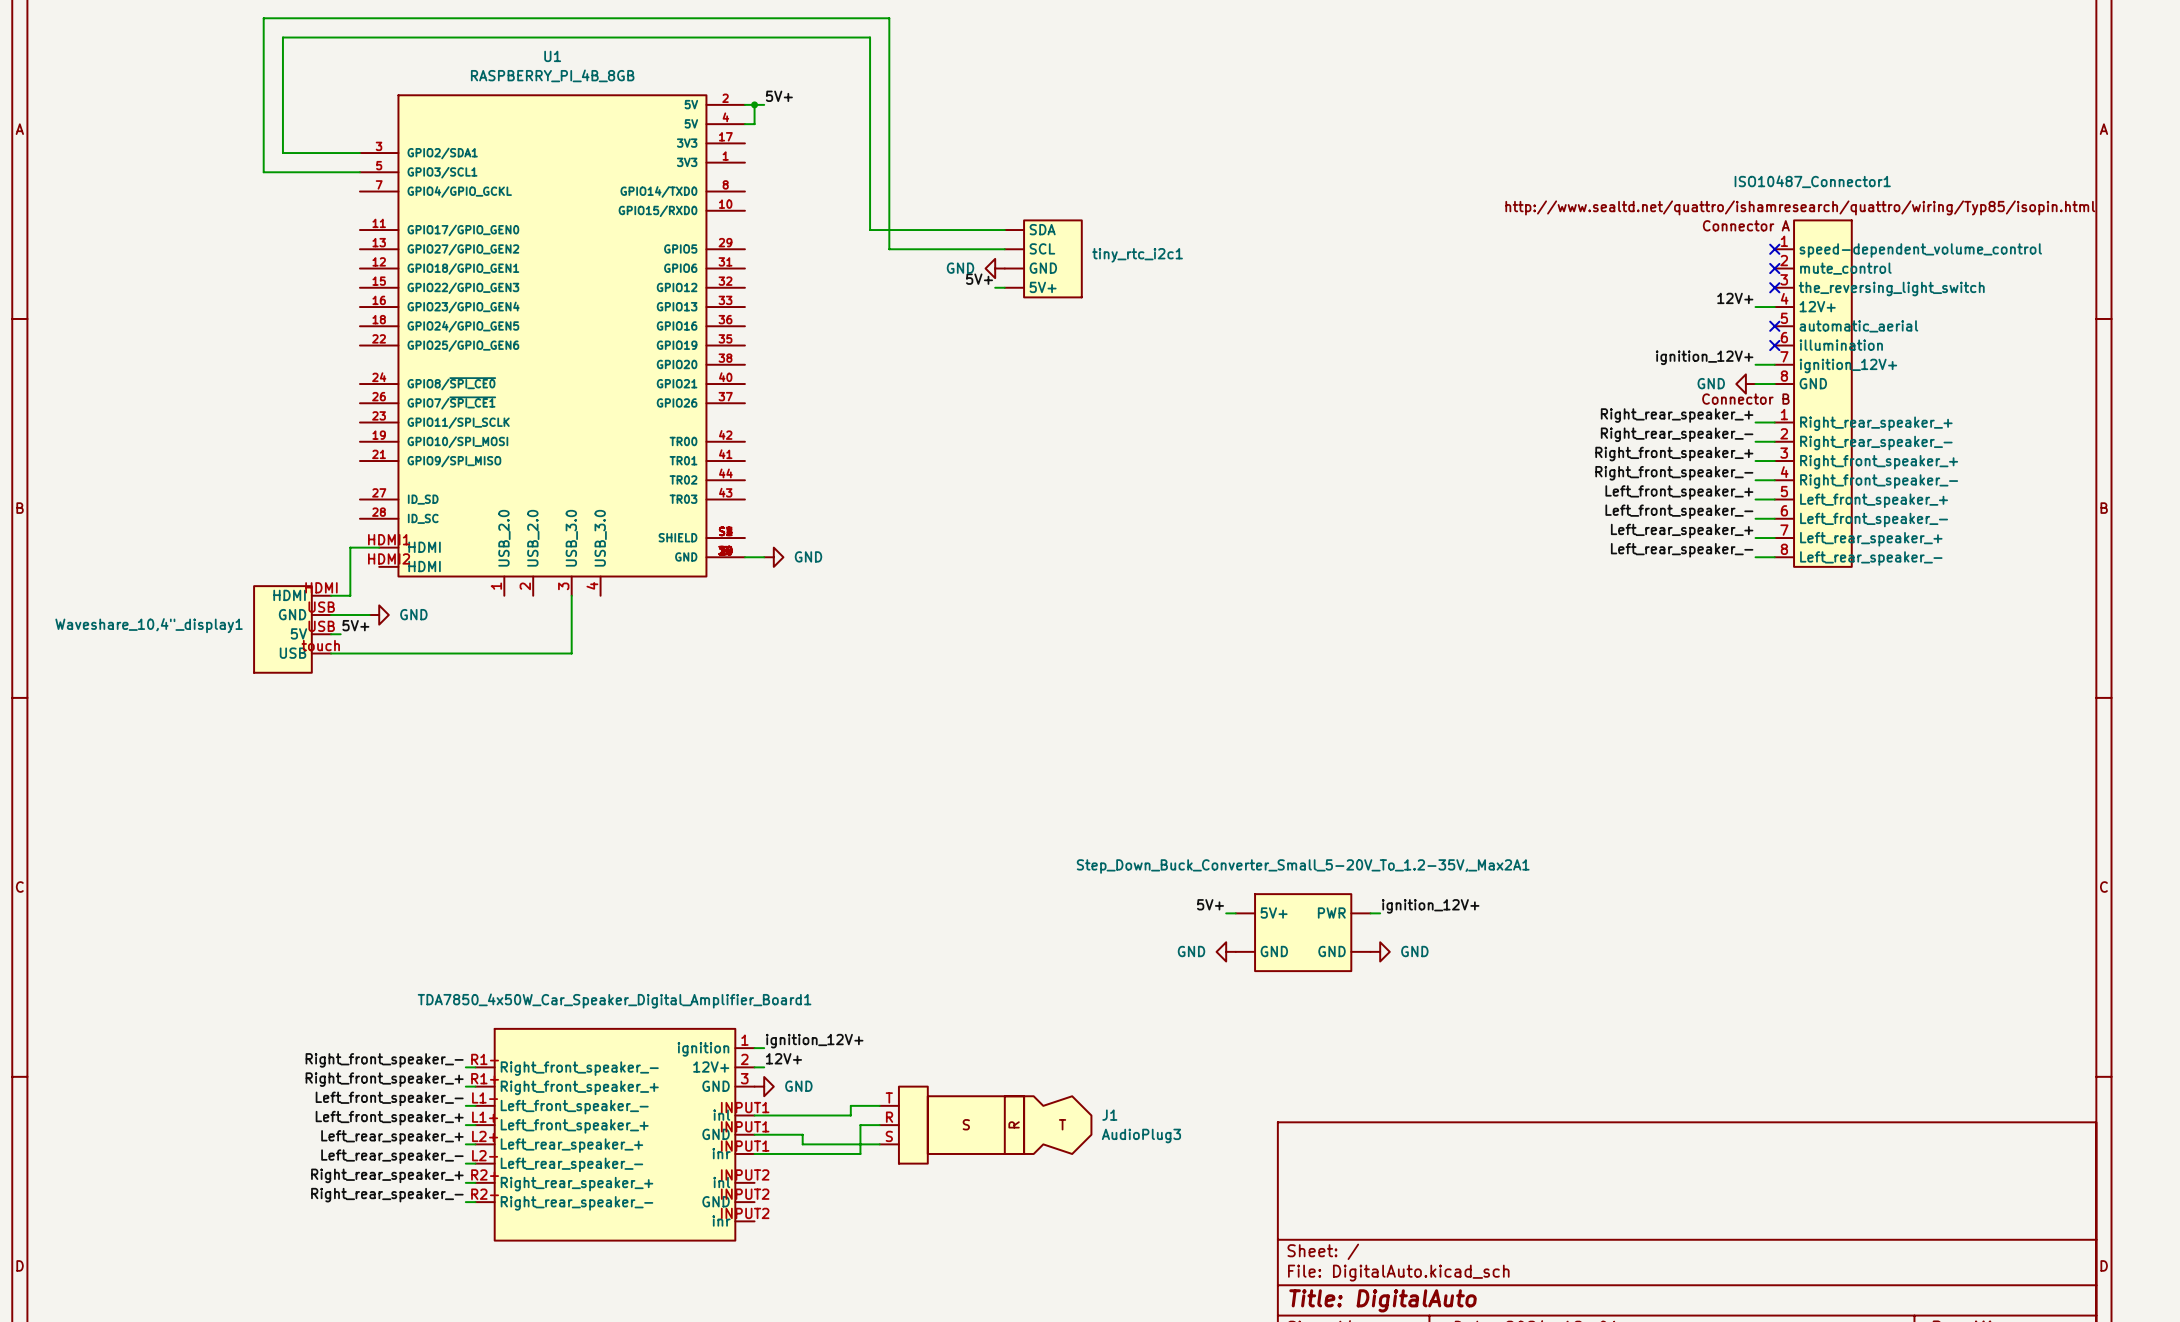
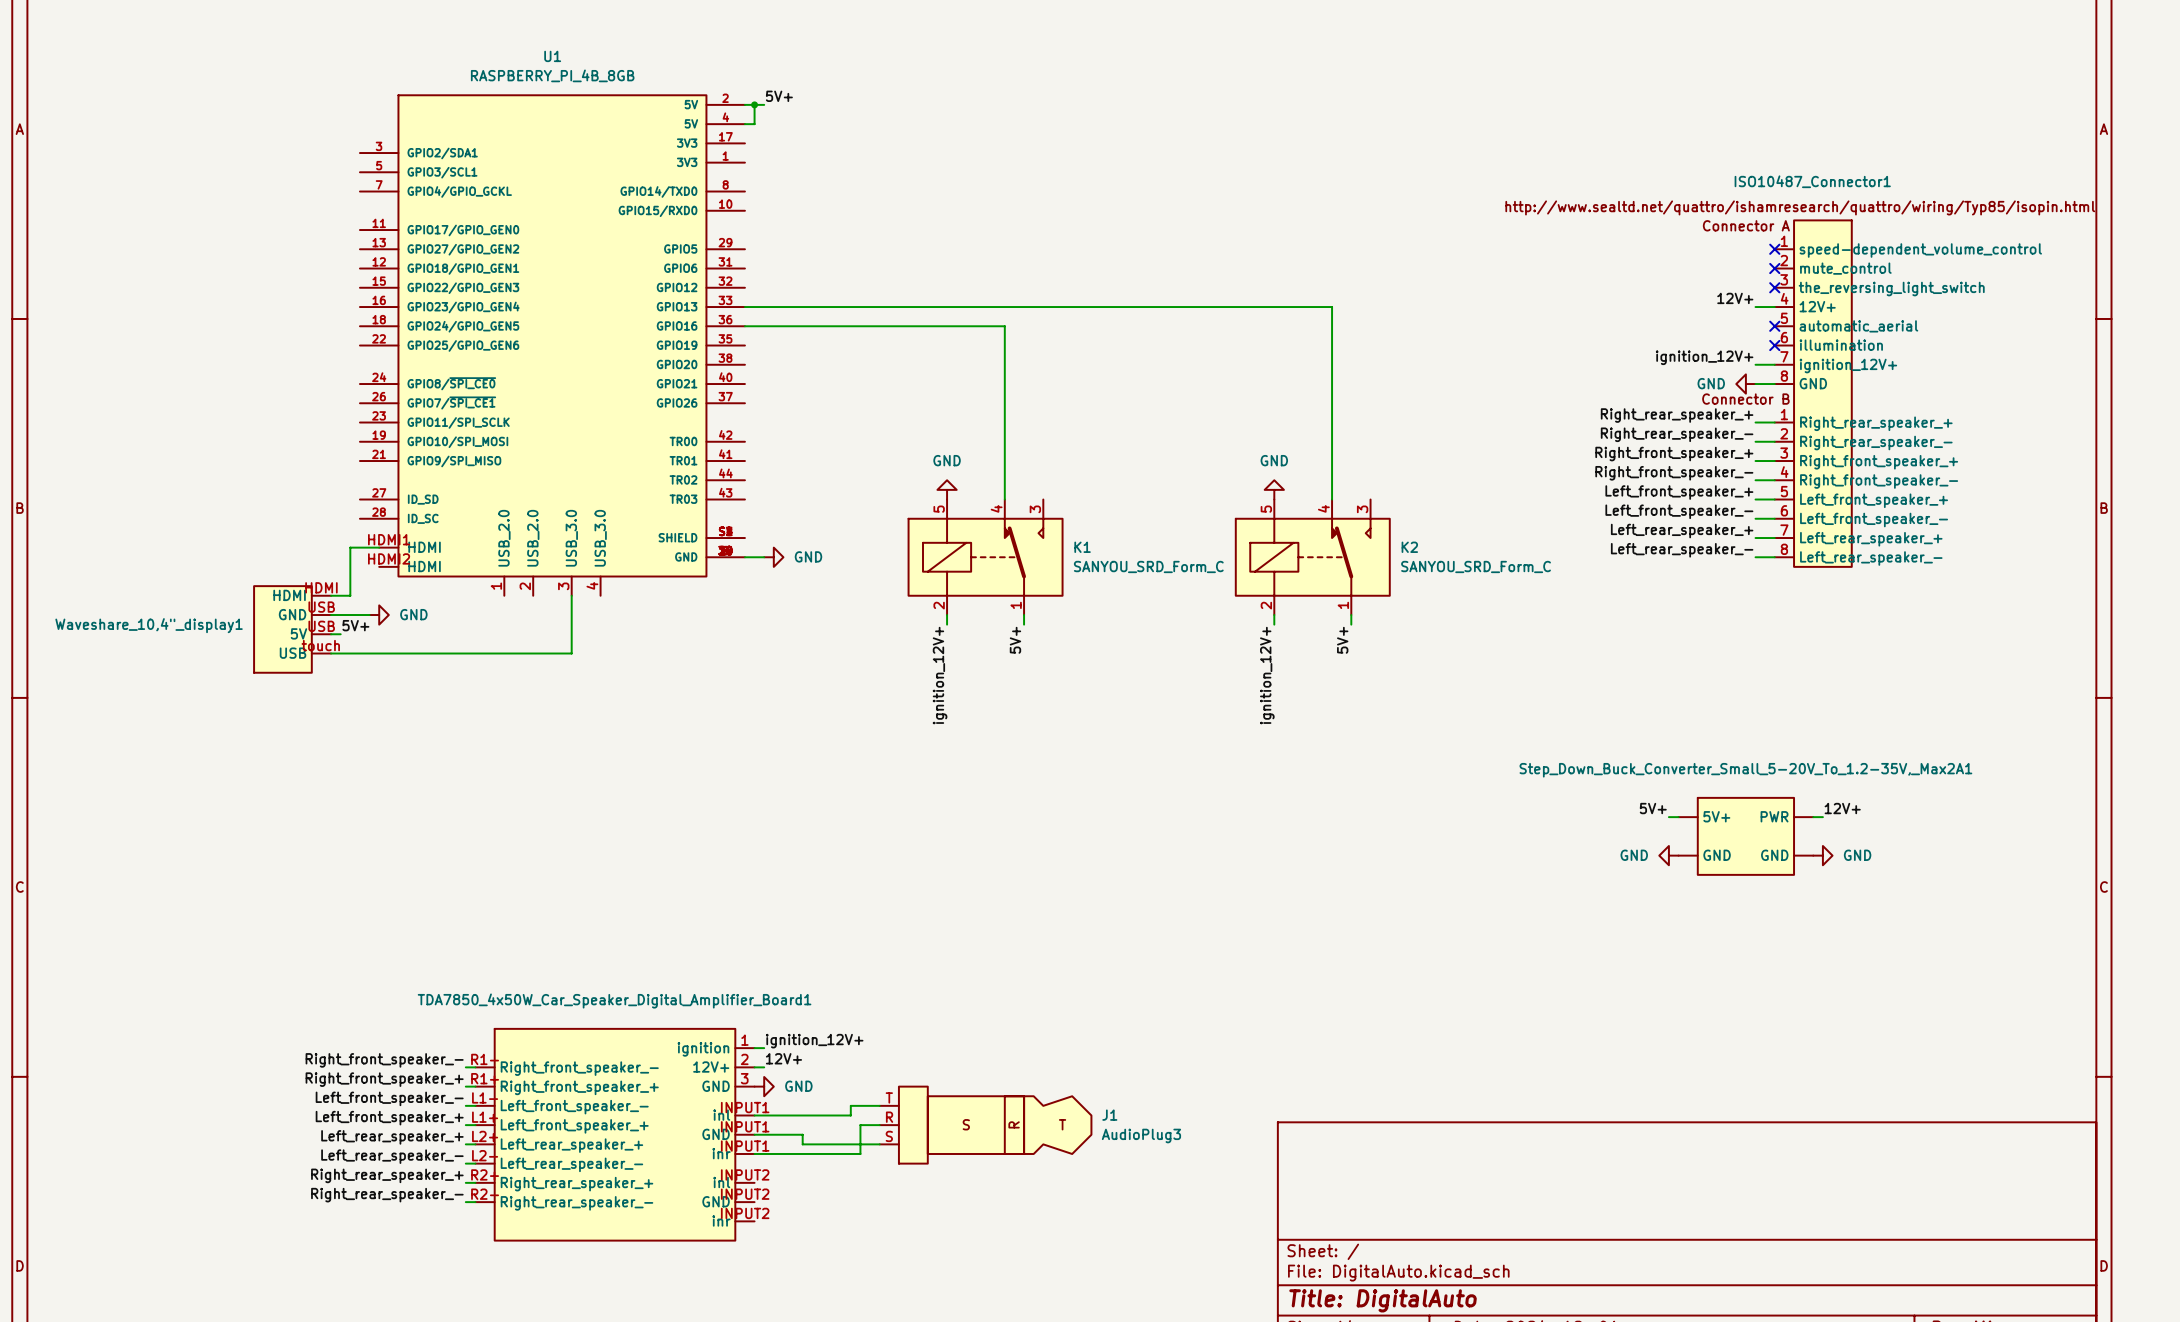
wire: (359, 153) (282, 153) (282, 37) (870, 37) (870, 230) (1004, 230) -> none
wire: (359, 172) (263, 172) (263, 18) (889, 18) (889, 249) (1004, 249) -> none
tiny_rtc_i2c1: (1043, 258) -> none
power symbol: GND (995, 268) -> none
label: 5V+ (979, 279) -> none
wire: (995, 287) (1004, 287) -> none
wire: none -> (744, 307) (1332, 307) (1332, 499)
wire: none -> (744, 326) (1004, 326) (1004, 499)
power symbol: none -> GND (947, 489)
power symbol: none -> GND (1274, 489)
K1: none -> SANYOU_SRD_Form_C (985, 557)
K2: none -> SANYOU_SRD_Form_C (1312, 557)
wire: none -> (947, 615) (947, 624)
wire: none -> (1024, 615) (1024, 624)
wire: none -> (1274, 615) (1274, 624)
wire: none -> (1351, 615) (1351, 624)
label: none -> 5V+ (1015, 640)
label: none -> 5V+ (1342, 640)
label: none -> ignition_12V+ (940, 675)
label: none -> ignition_12V+ (1267, 675)
label: none -> 5V+ (1653, 808)
label: none -> 12V+ (1842, 808)
wire: none -> (1668, 817) (1678, 817)
wire: none -> (1813, 817) (1822, 817)
power symbol: none -> GND (1668, 855)
power symbol: none -> GND (1822, 855)
label: 5V+ (1210, 904) -> none
label: ignition_12V+ (1430, 906) -> none
wire: (1226, 913) (1235, 913) -> none
wire: (1370, 913) (1380, 913) -> none
Step_Down_Buck_Converter_Small_5-20V_To_1.2-35V,_Max2A1 position: (1303, 932) -> (1745, 836)
power symbol: GND (1226, 951) -> none
power symbol: GND (1380, 951) -> none

